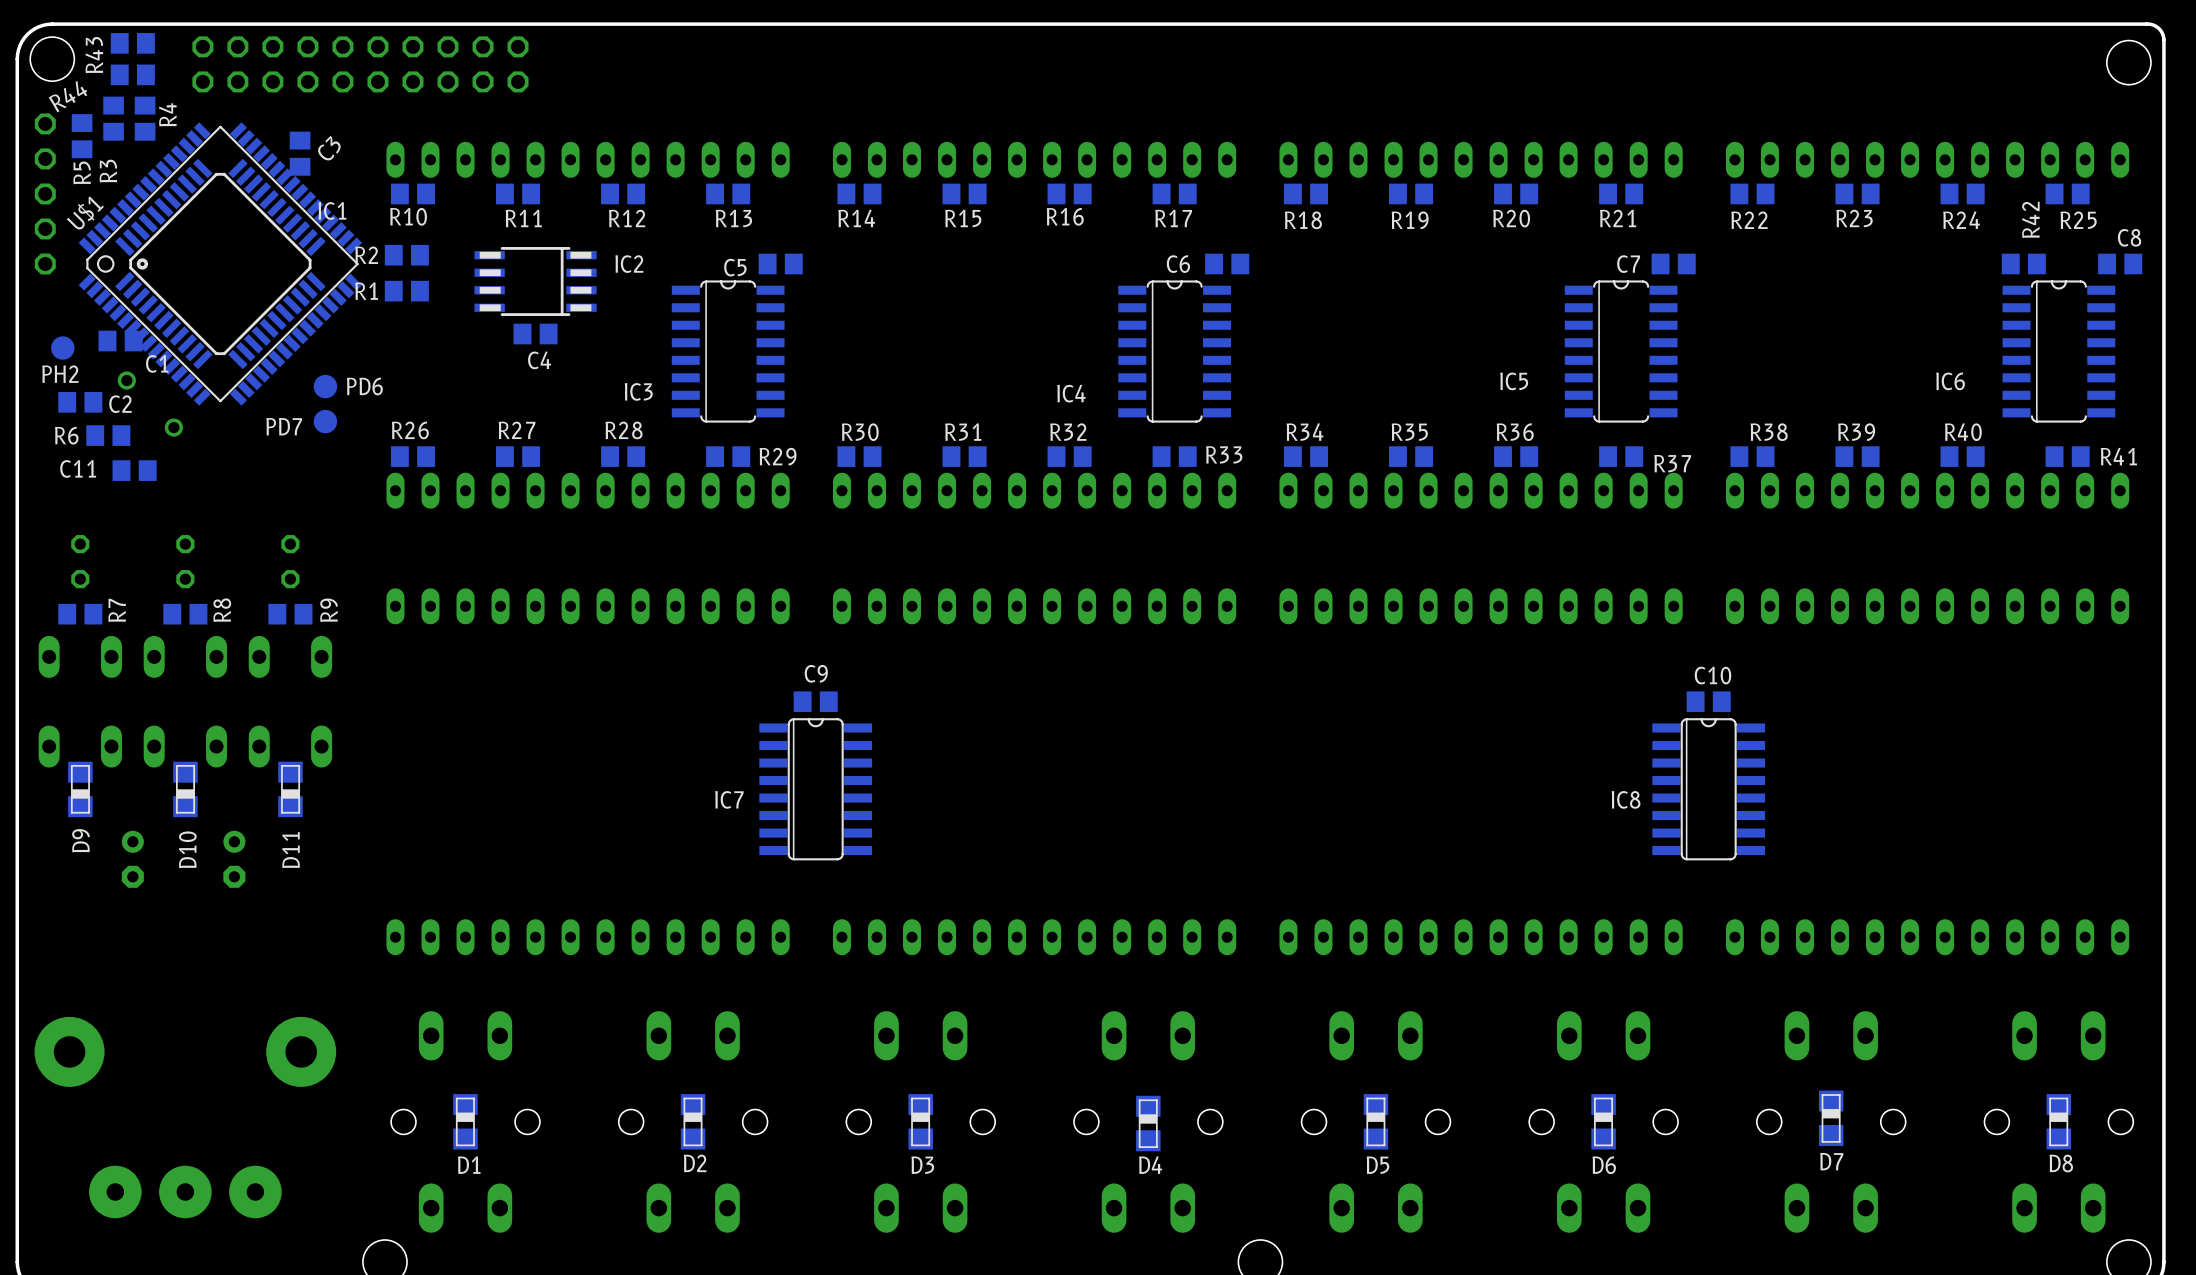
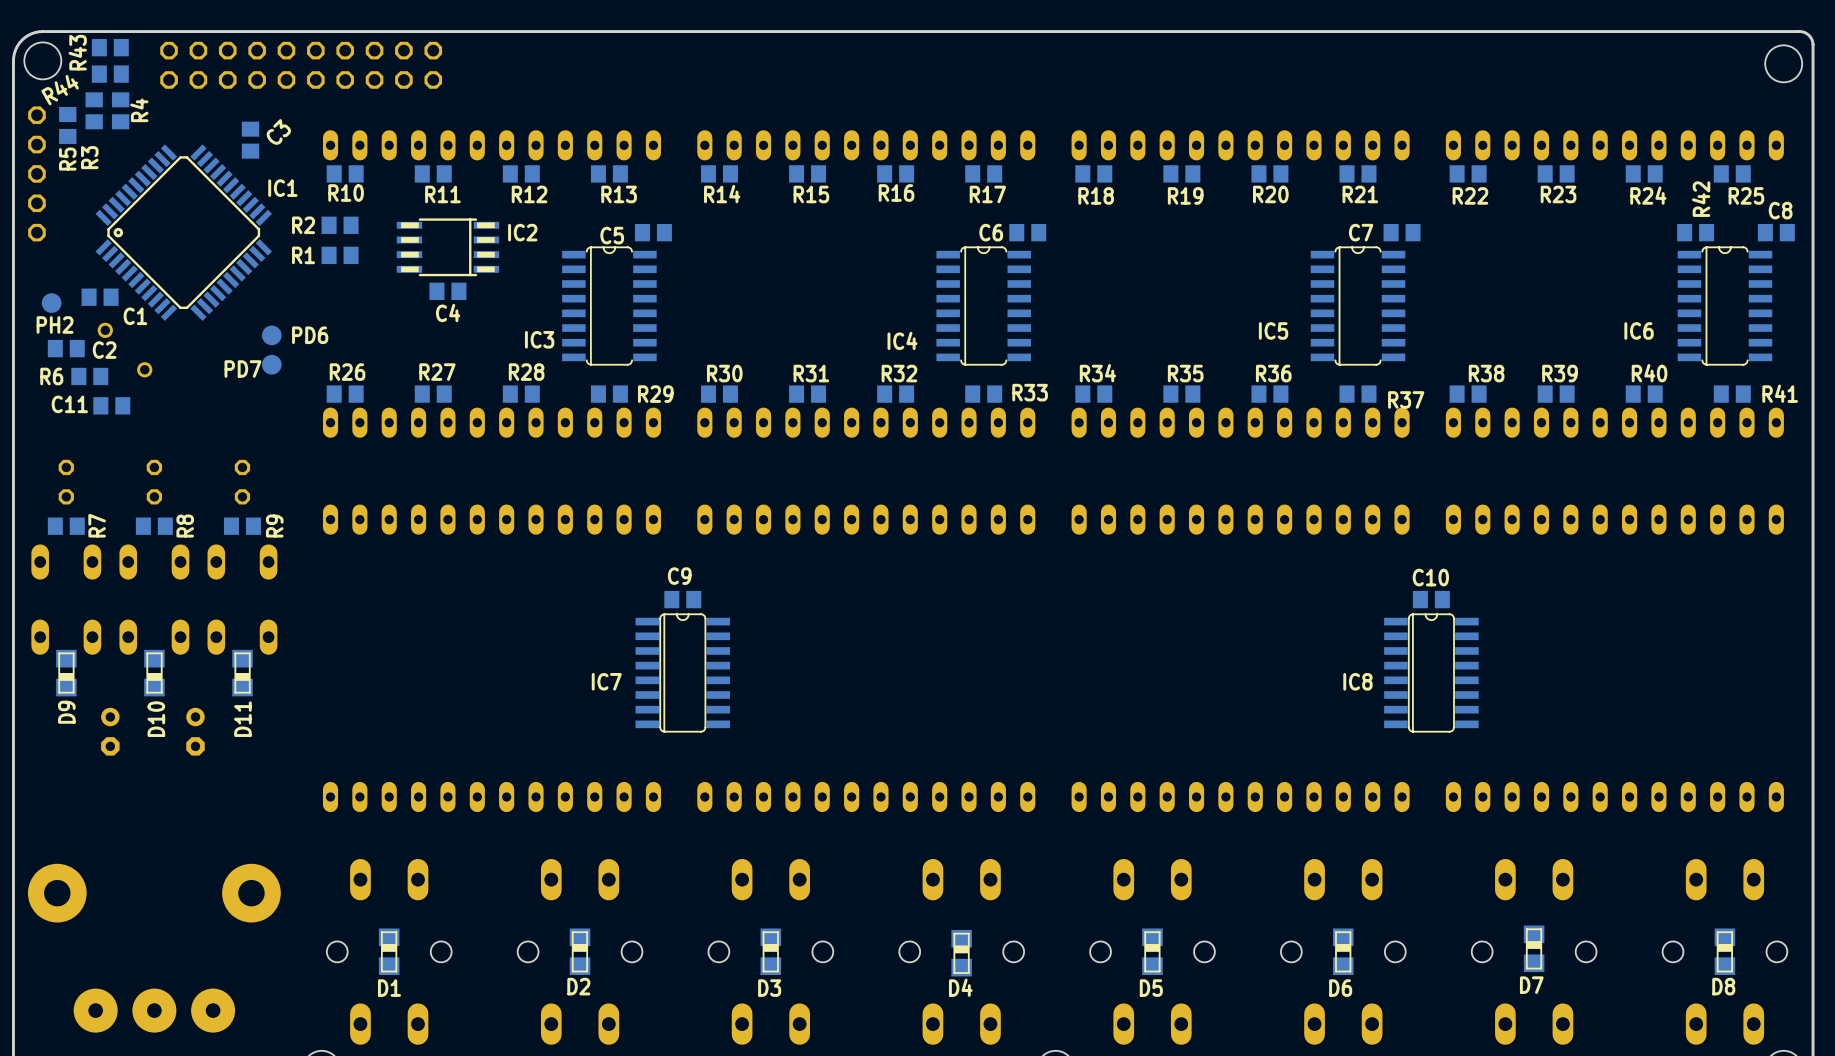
U$1: (220, 263) -> none

